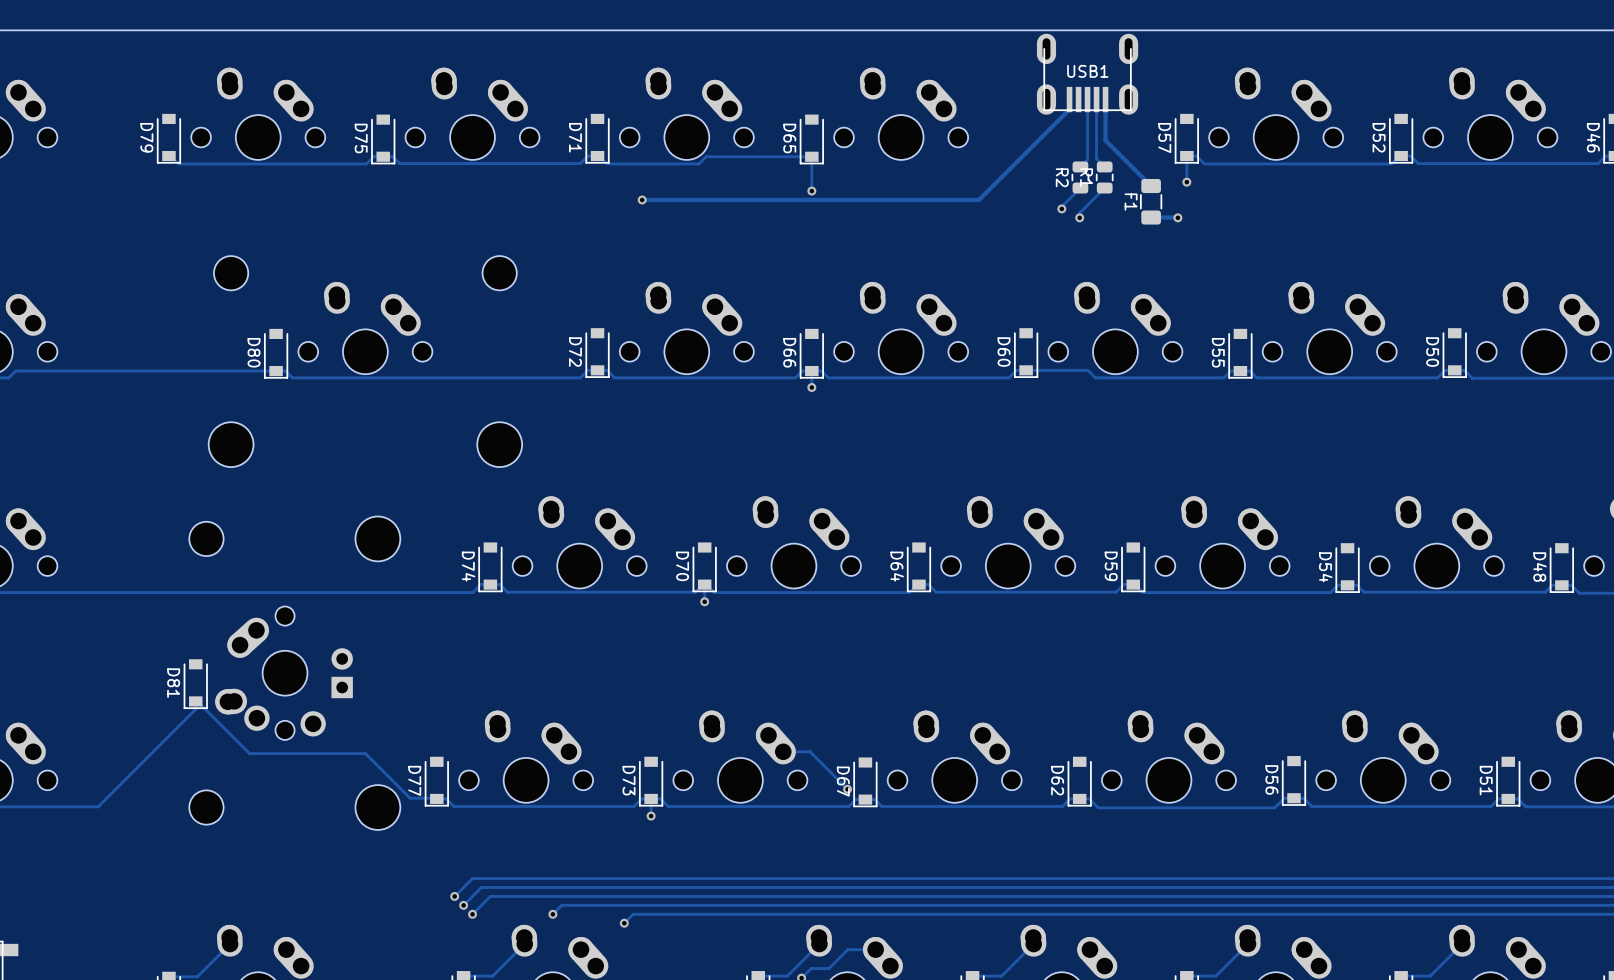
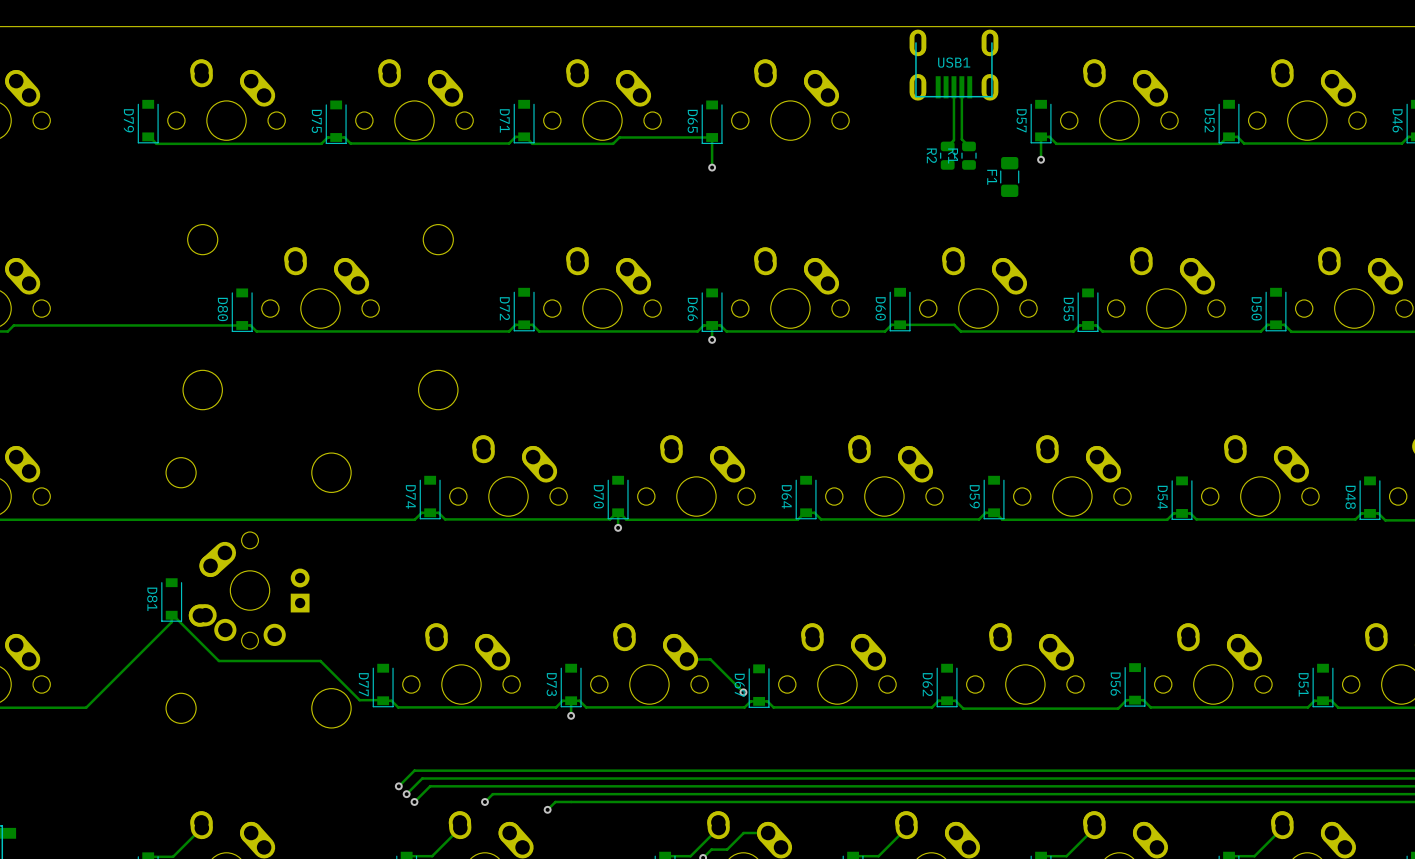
track: (1069, 99) (1069, 109) (978, 199) (642, 199) -> none
track: (1105, 99) (1105, 140) (1151, 186) -> none
track: (1080, 188) (1061, 206) (1061, 208) -> none
track: (1104, 188) (1079, 213) (1079, 217) -> none
via: (642, 199) -> none
via: (1061, 208) -> none
via: (1079, 217) -> none
track: (1151, 217) (1177, 217) -> none
via: (1177, 217) -> none

